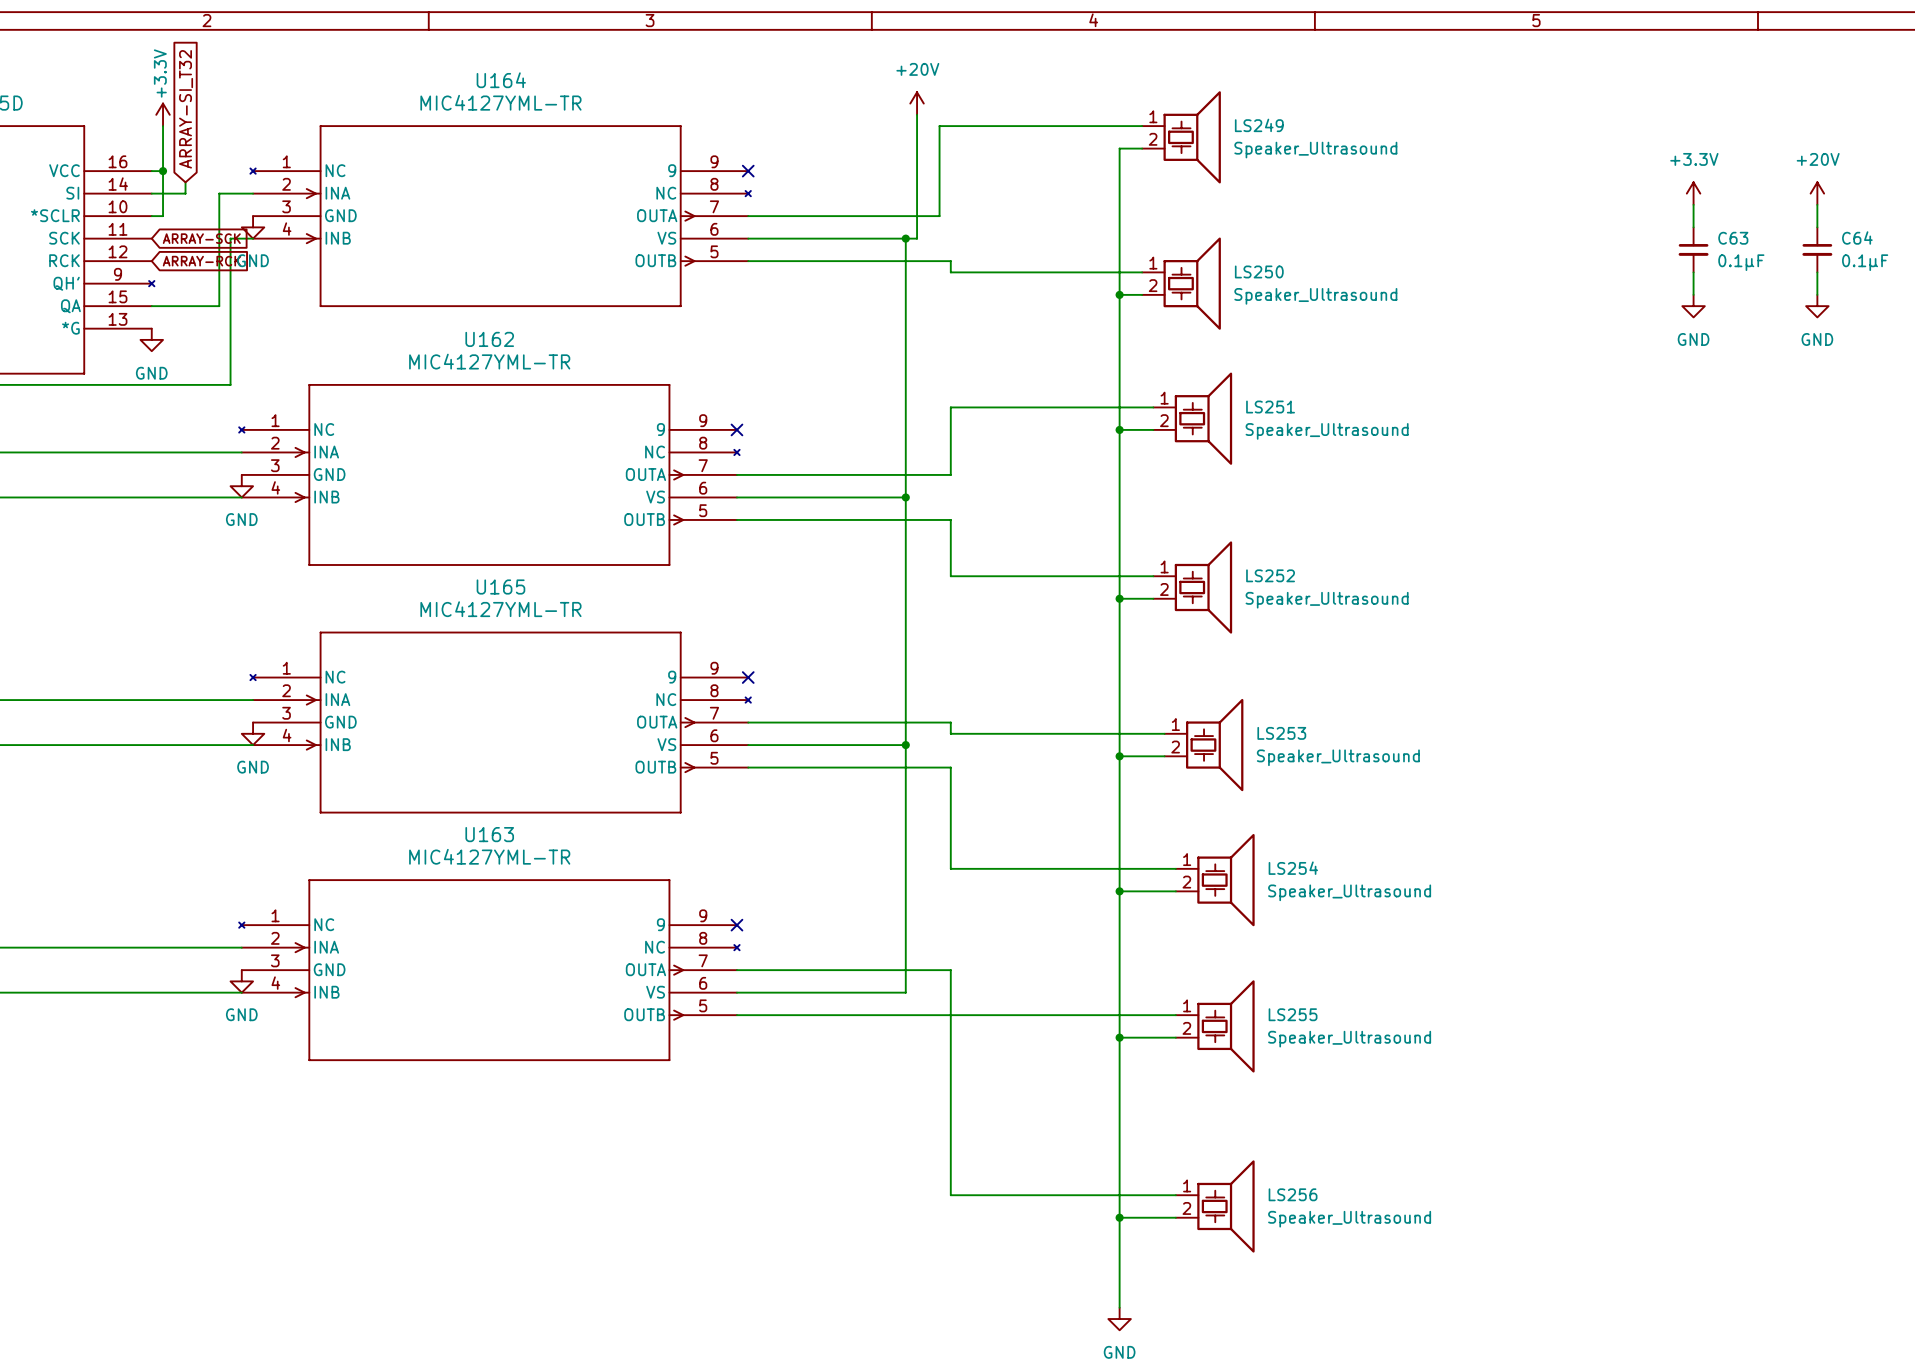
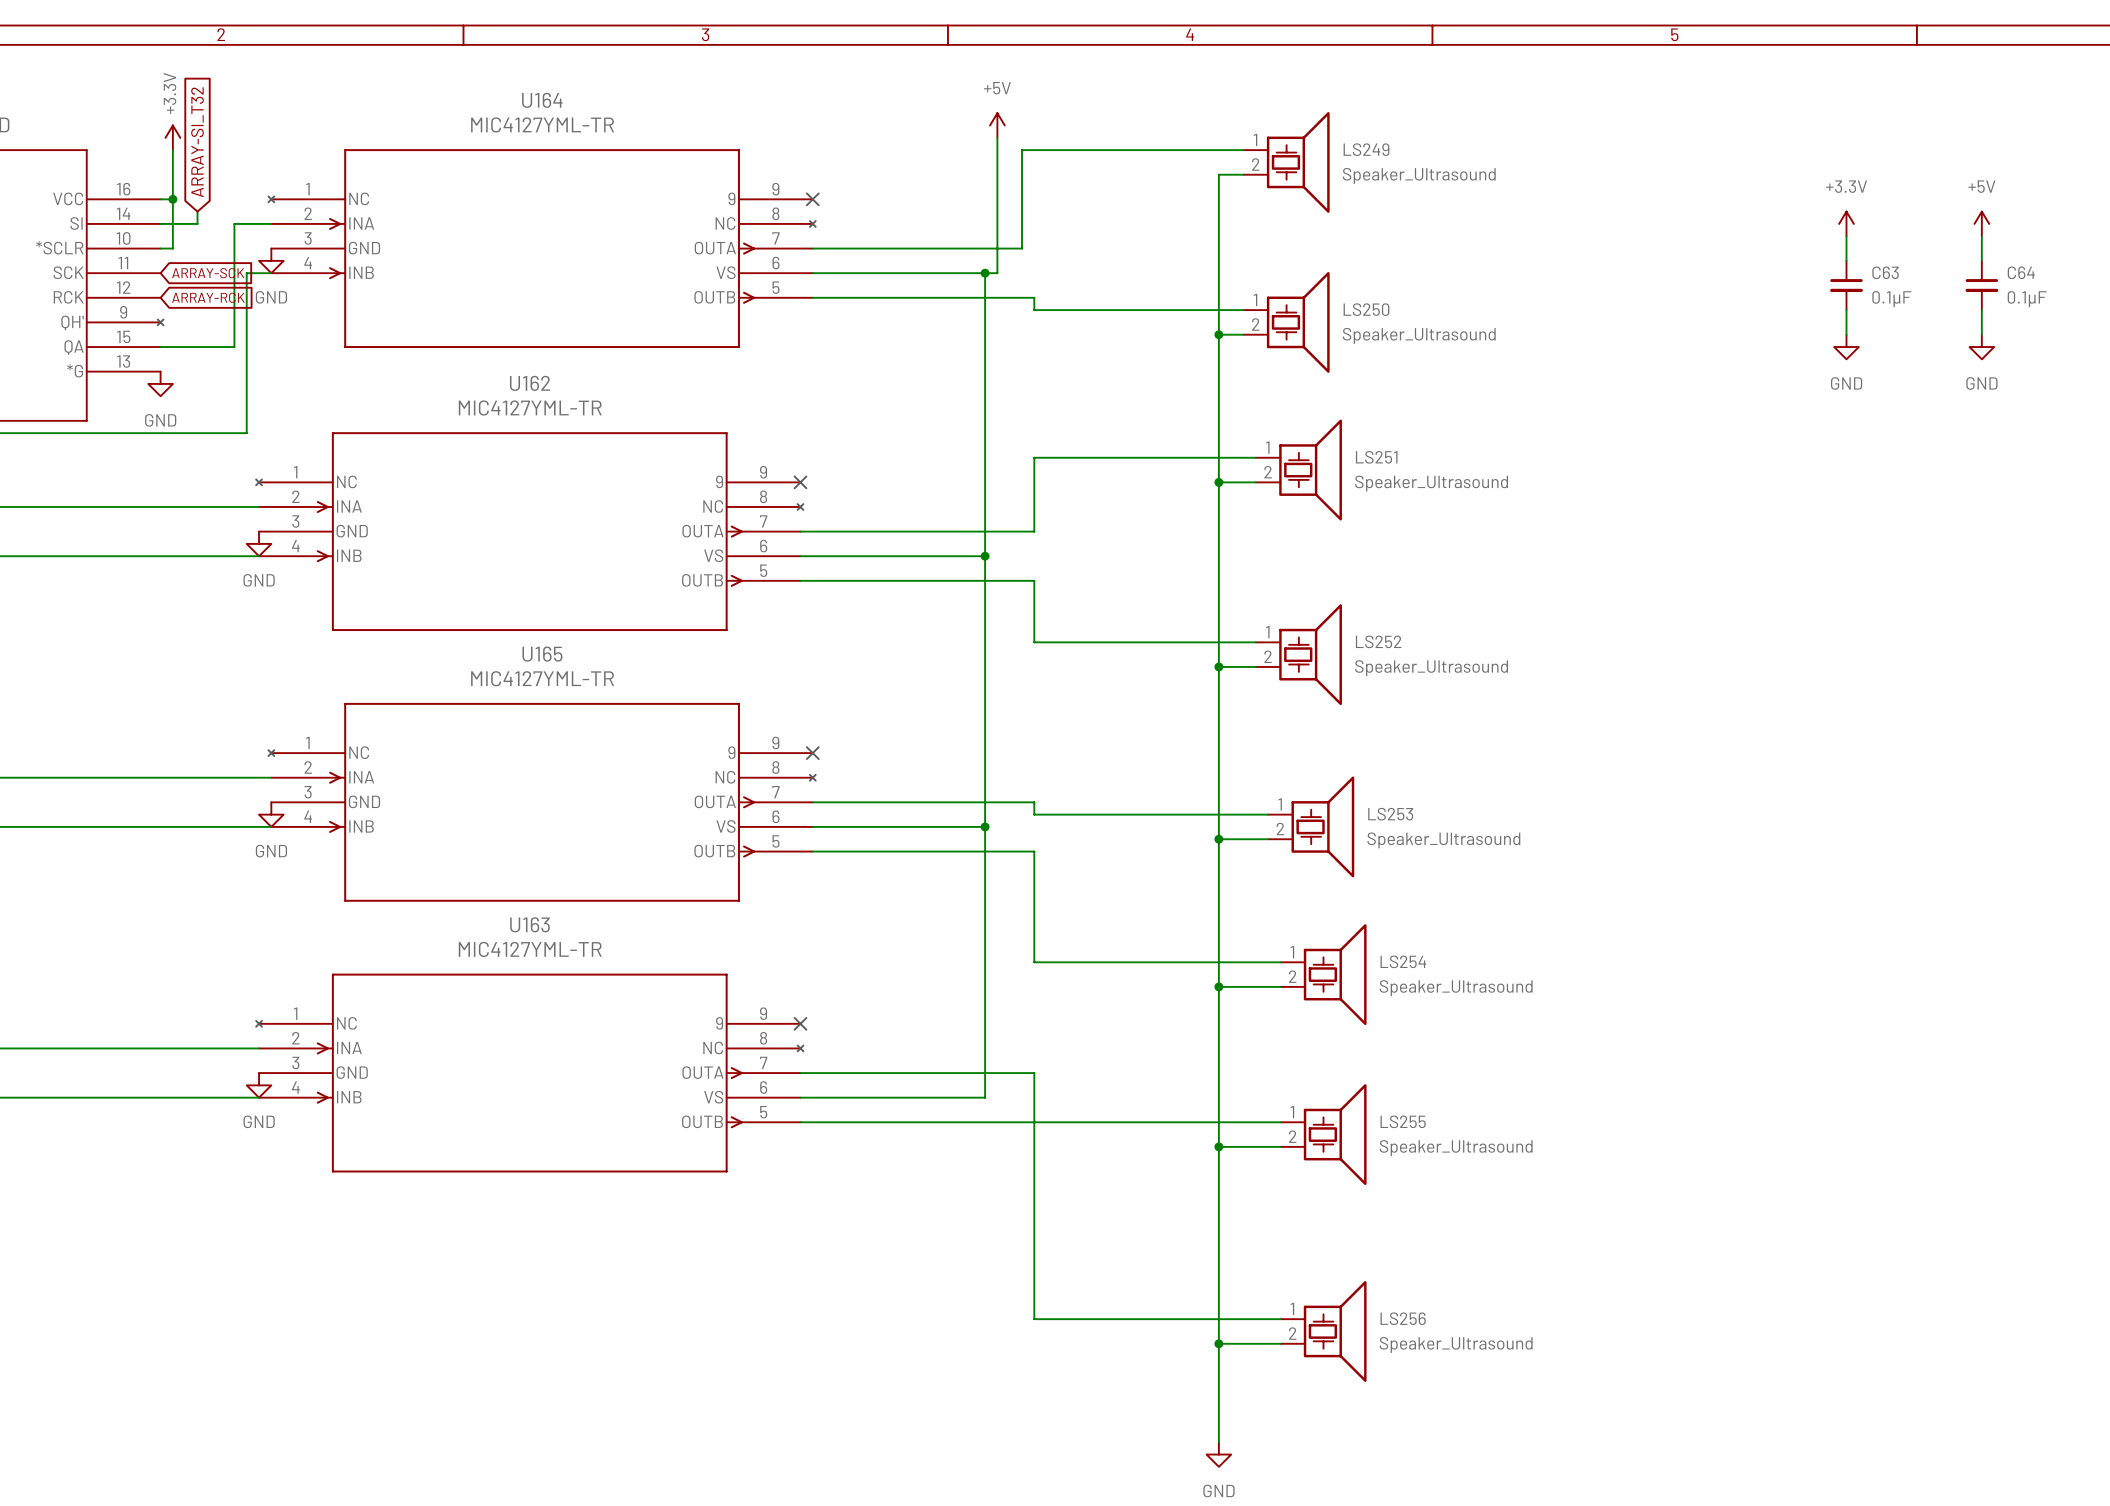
power symbol: +20V (917, 103) -> +5V (997, 125)
power symbol: +20V (1817, 193) -> +5V (1981, 223)

